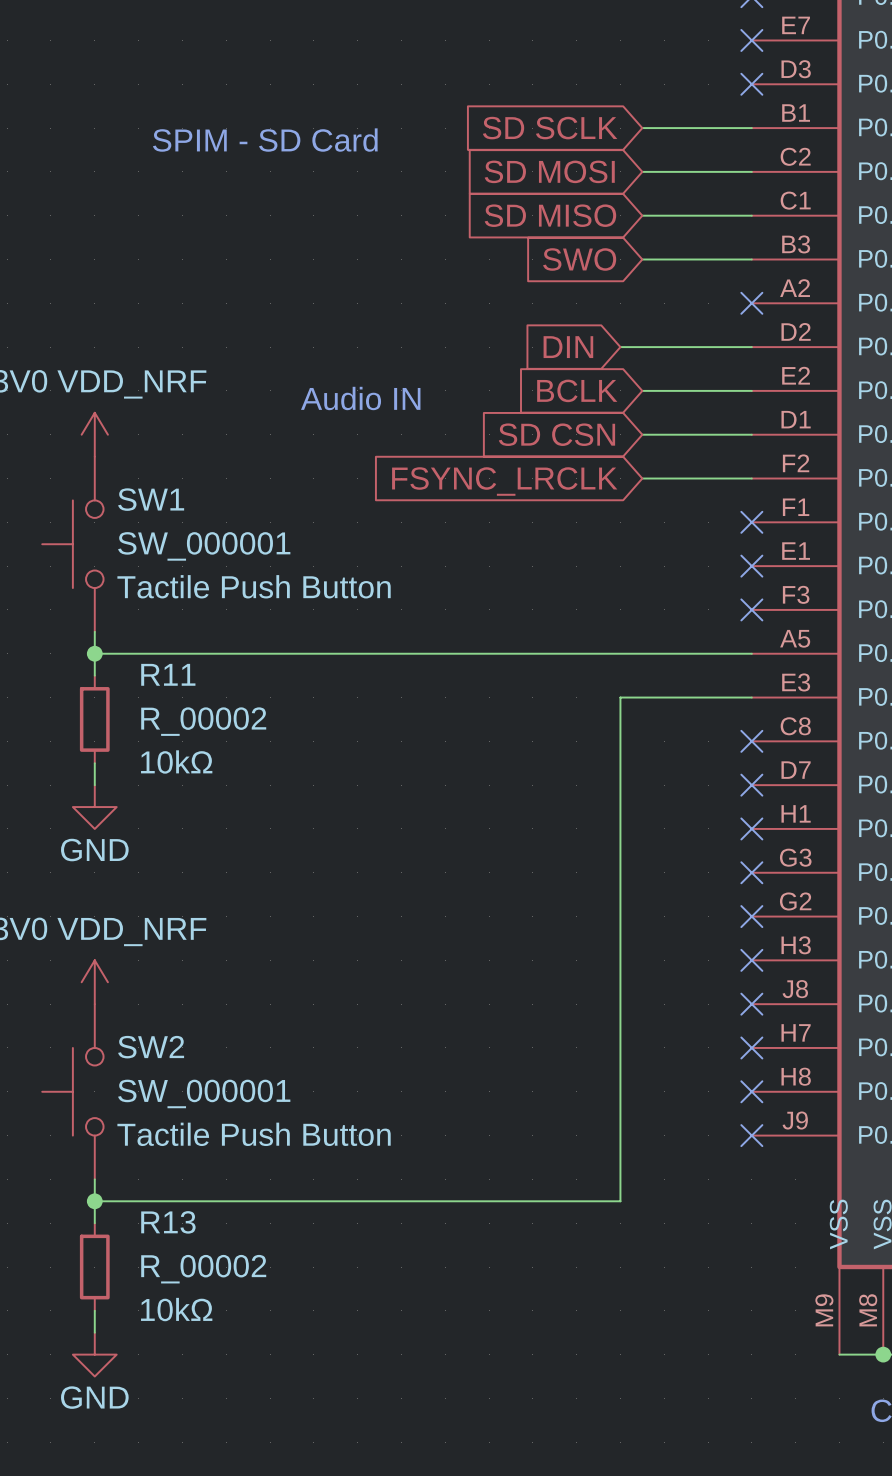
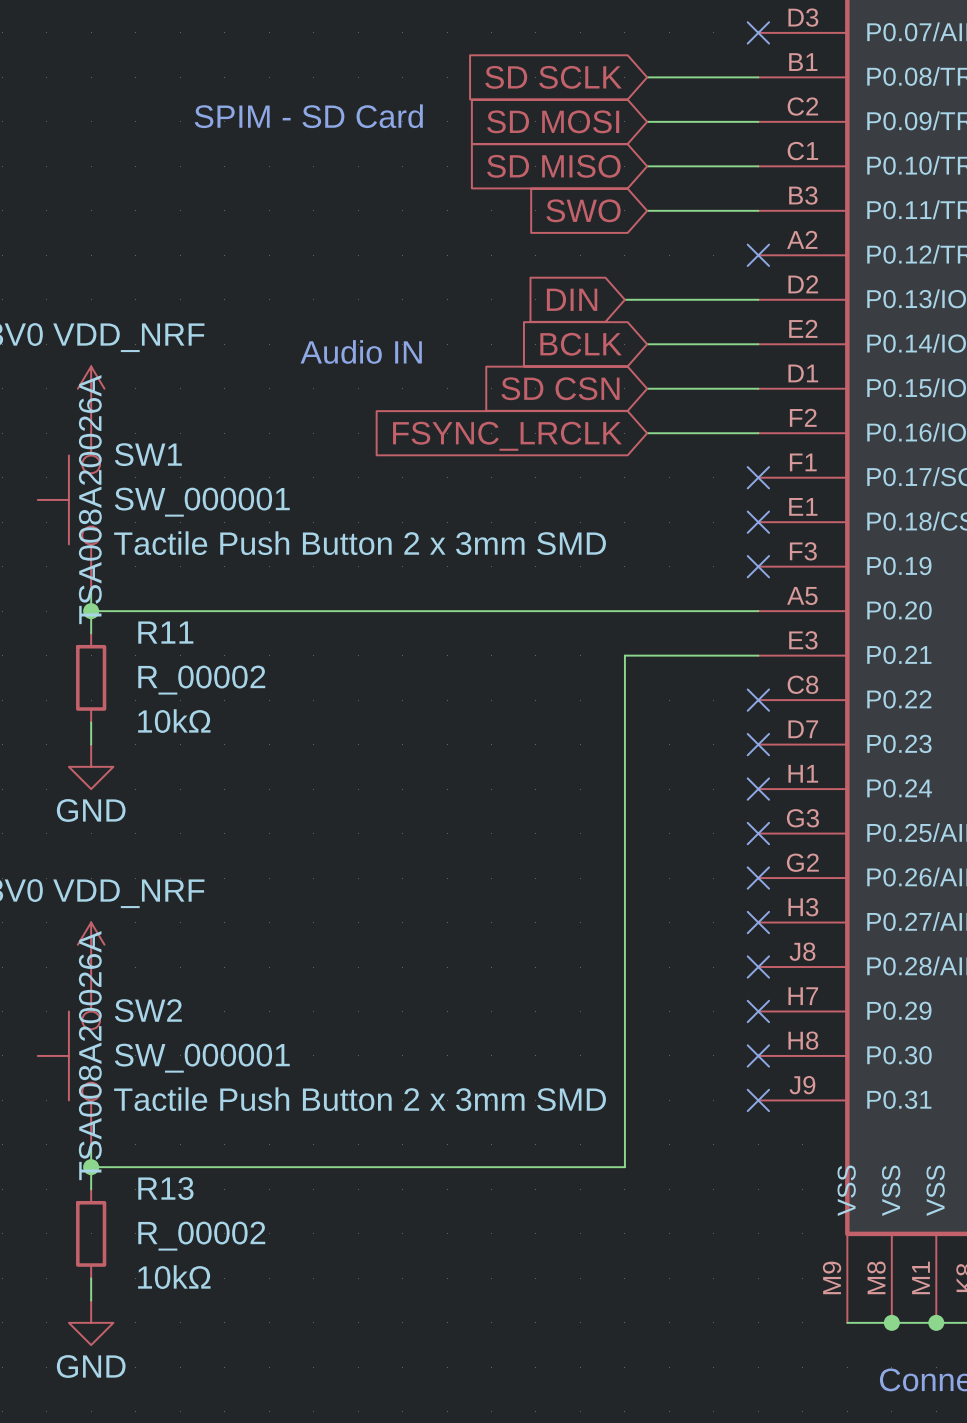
text position: SPIM - SD Card (265, 140) -> SPIM - SD Card (308, 116)
SW1 text: none -> TSA008A20026A (90, 499)
SW1 text: Tactile Push Button (254, 586) -> Tactile Push Button 2 x 3mm SMD (360, 543)
SW2 text: none -> TSA008A20026A (90, 1055)
SW2 text: Tactile Push Button (254, 1134) -> Tactile Push Button 2 x 3mm SMD (360, 1099)

